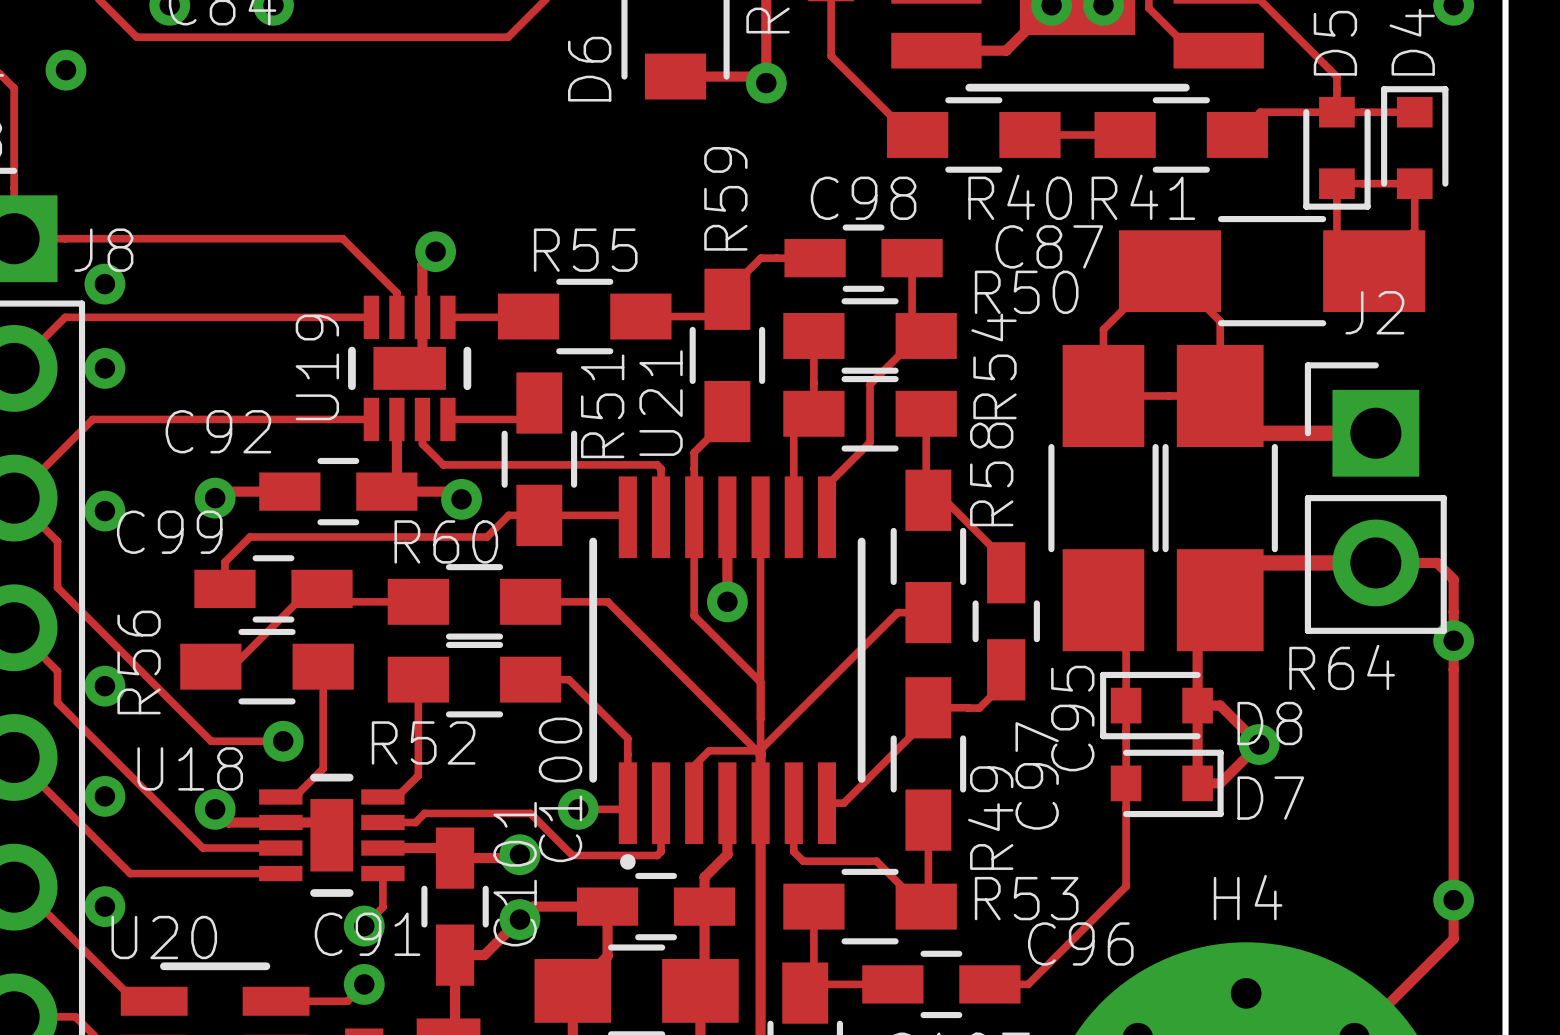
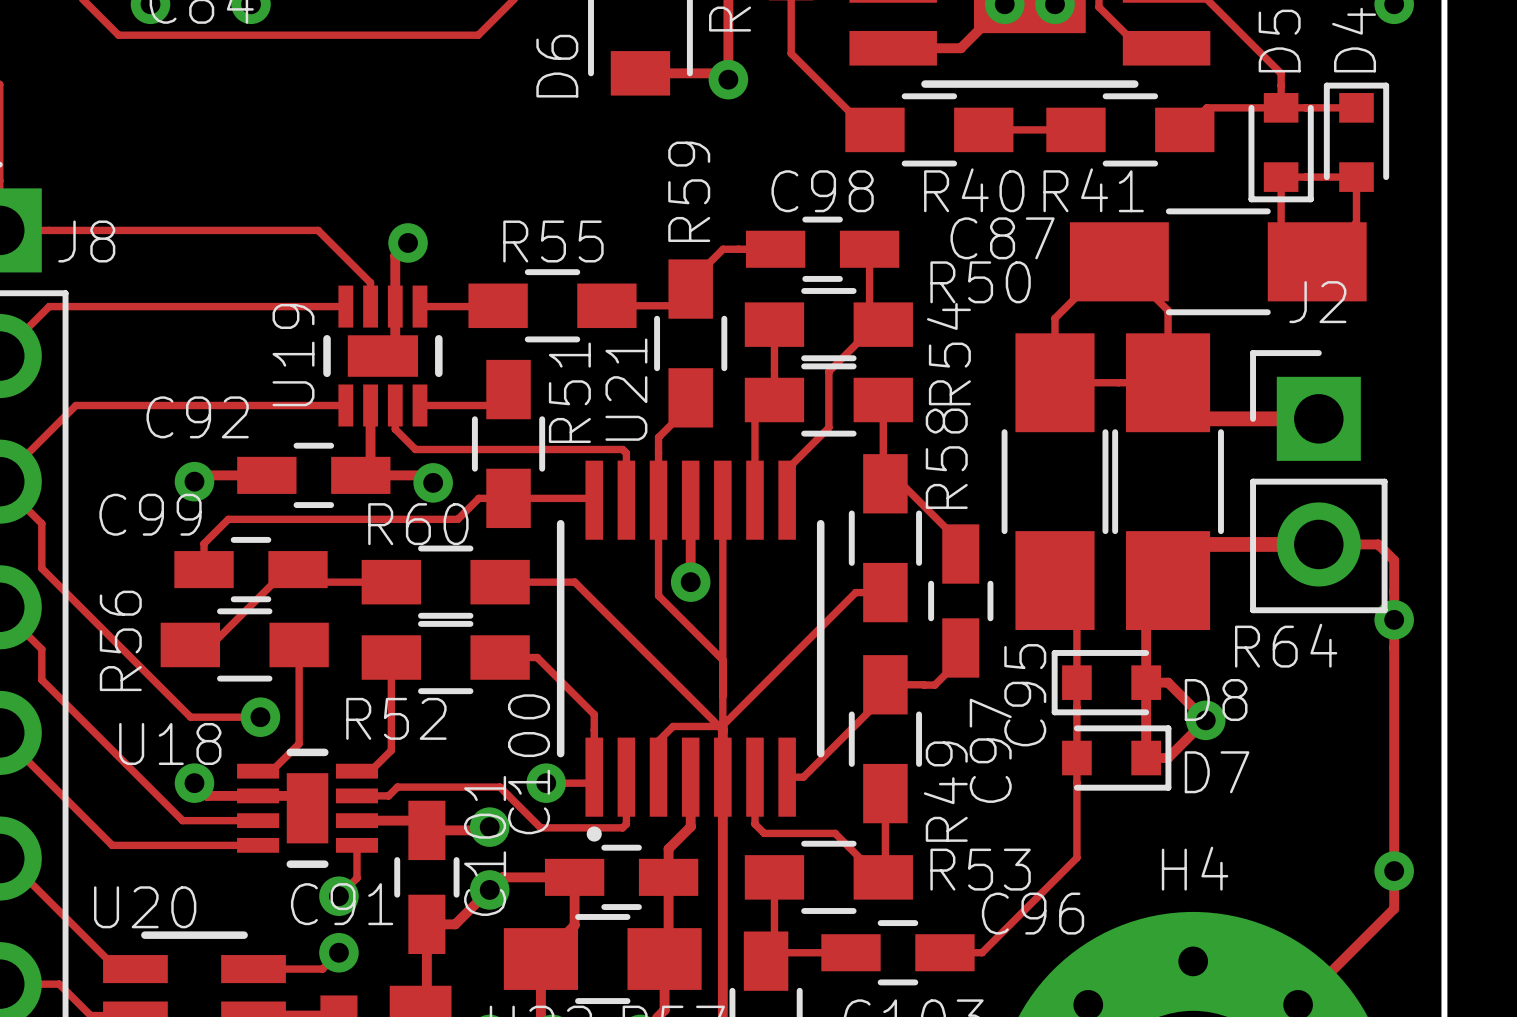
via: (66, 70) -> none
via: (104, 284) -> none
via: (104, 368) -> none
via: (104, 511) -> none
via: (104, 686) -> none
via: (104, 796) -> none
via: (104, 906) -> none

